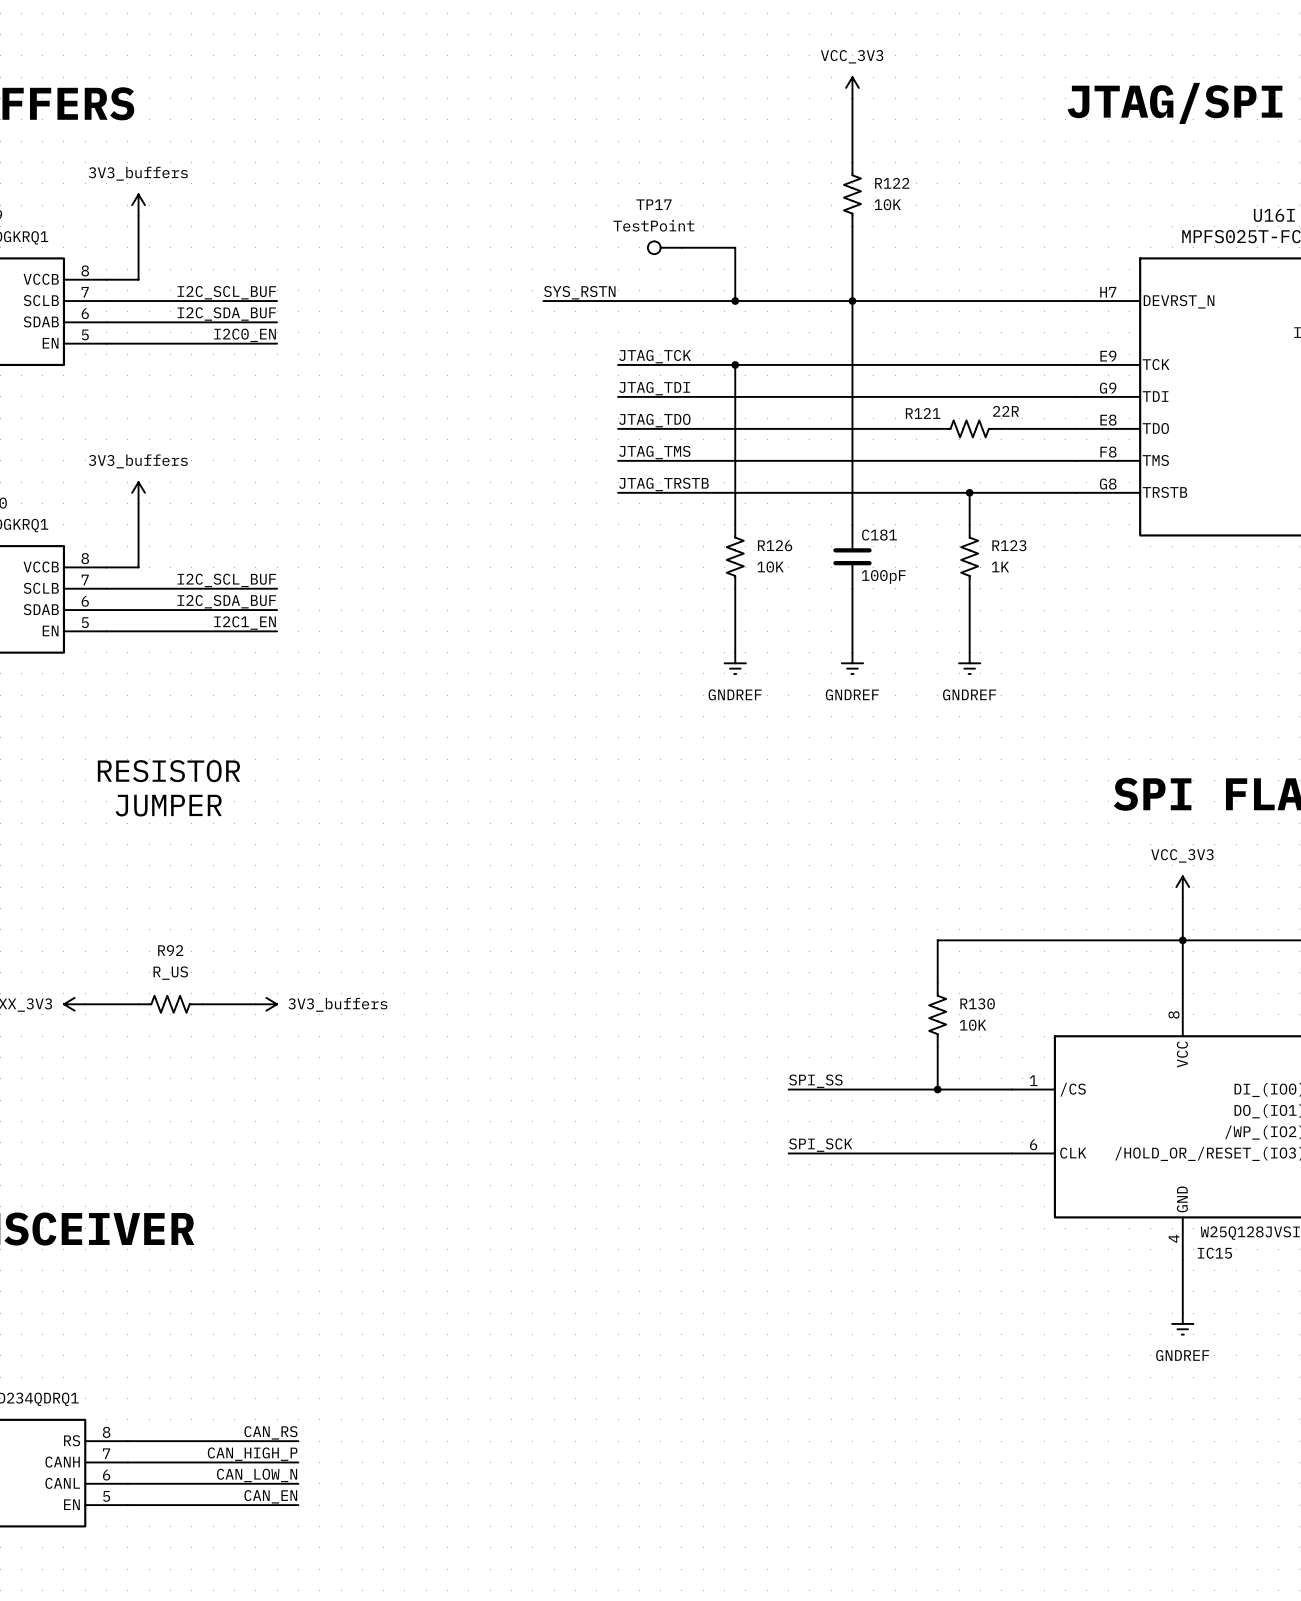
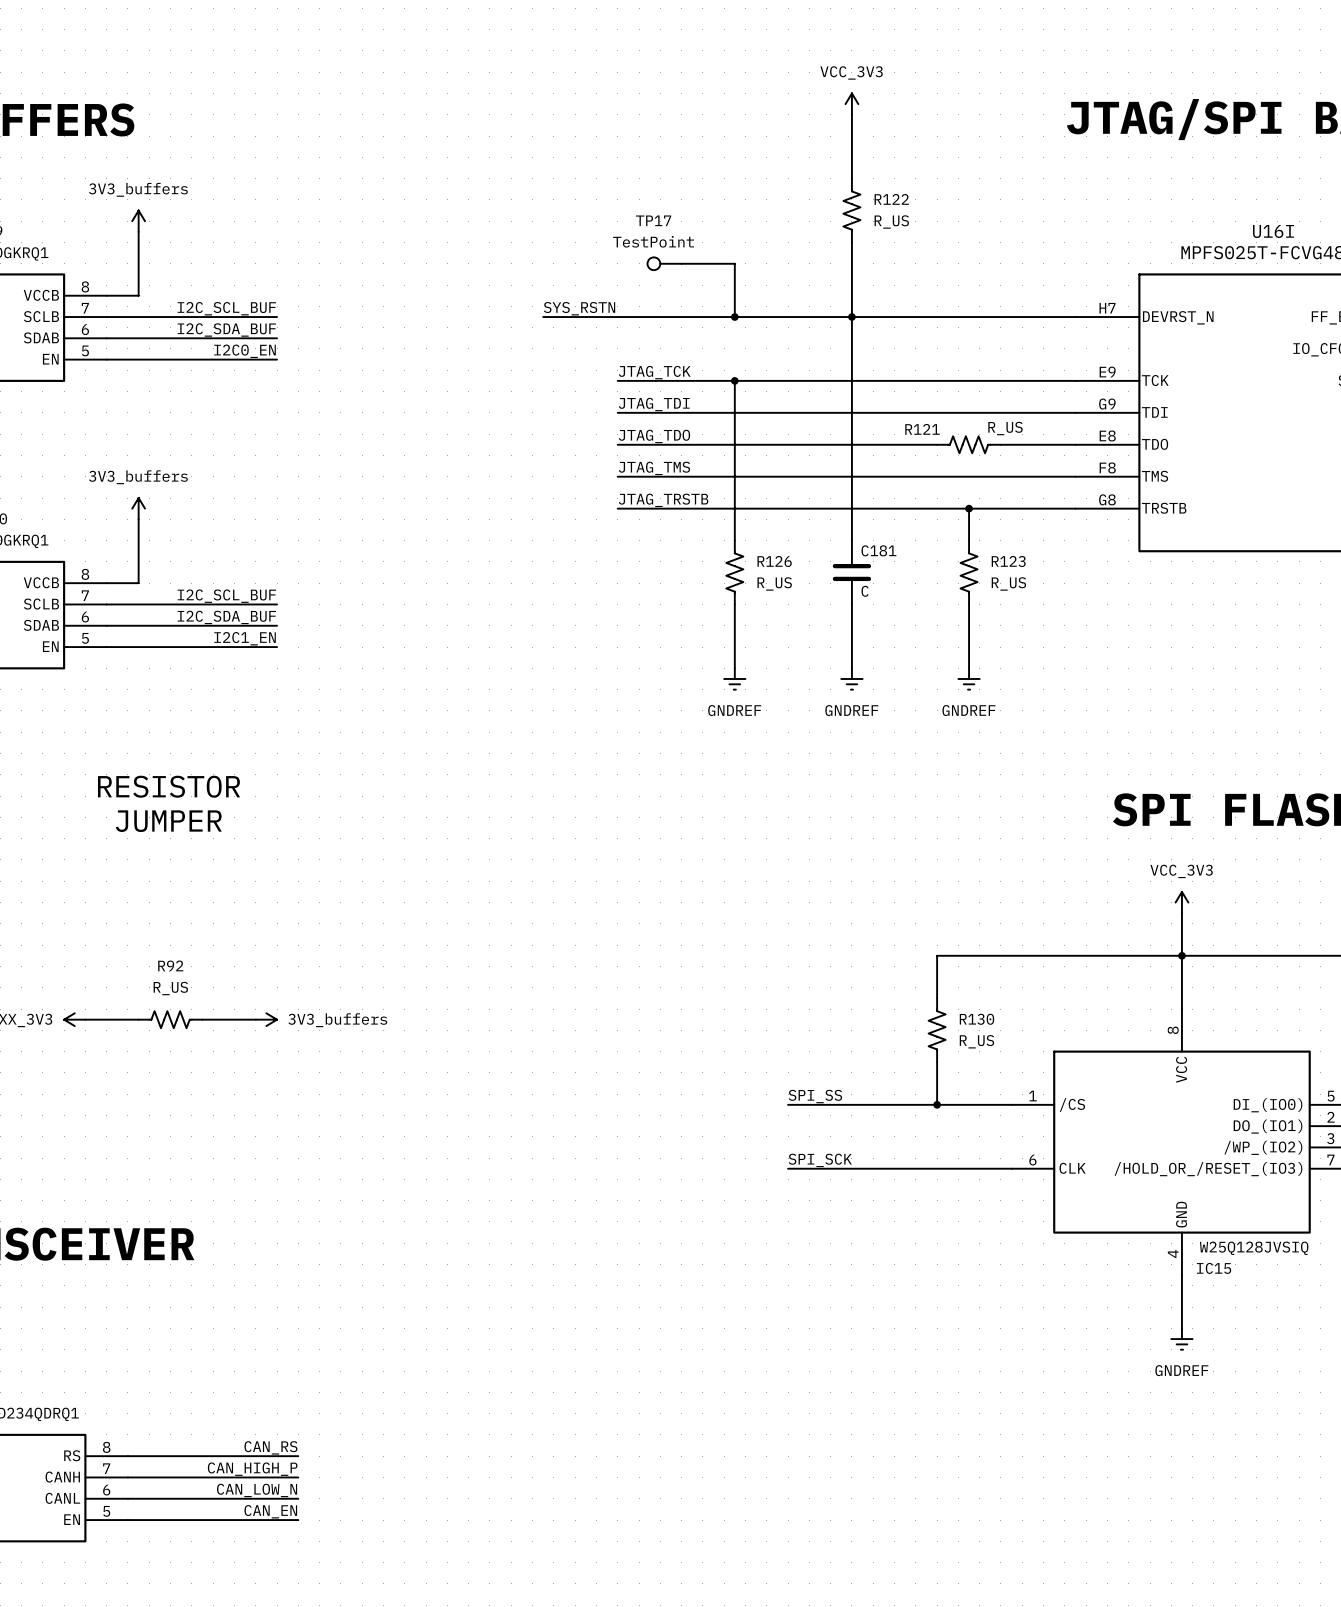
R122 value: 10K (887, 204) -> R_US (891, 222)
R121 value: 22R (1006, 411) -> R_US (1005, 428)
R126 value: 10K (770, 567) -> R_US (774, 583)
R123 value: 1K (1000, 567) -> R_US (1008, 583)
C181 value: 100pF (883, 576) -> C (865, 591)
R130 value: 10K (972, 1025) -> R_US (976, 1041)

